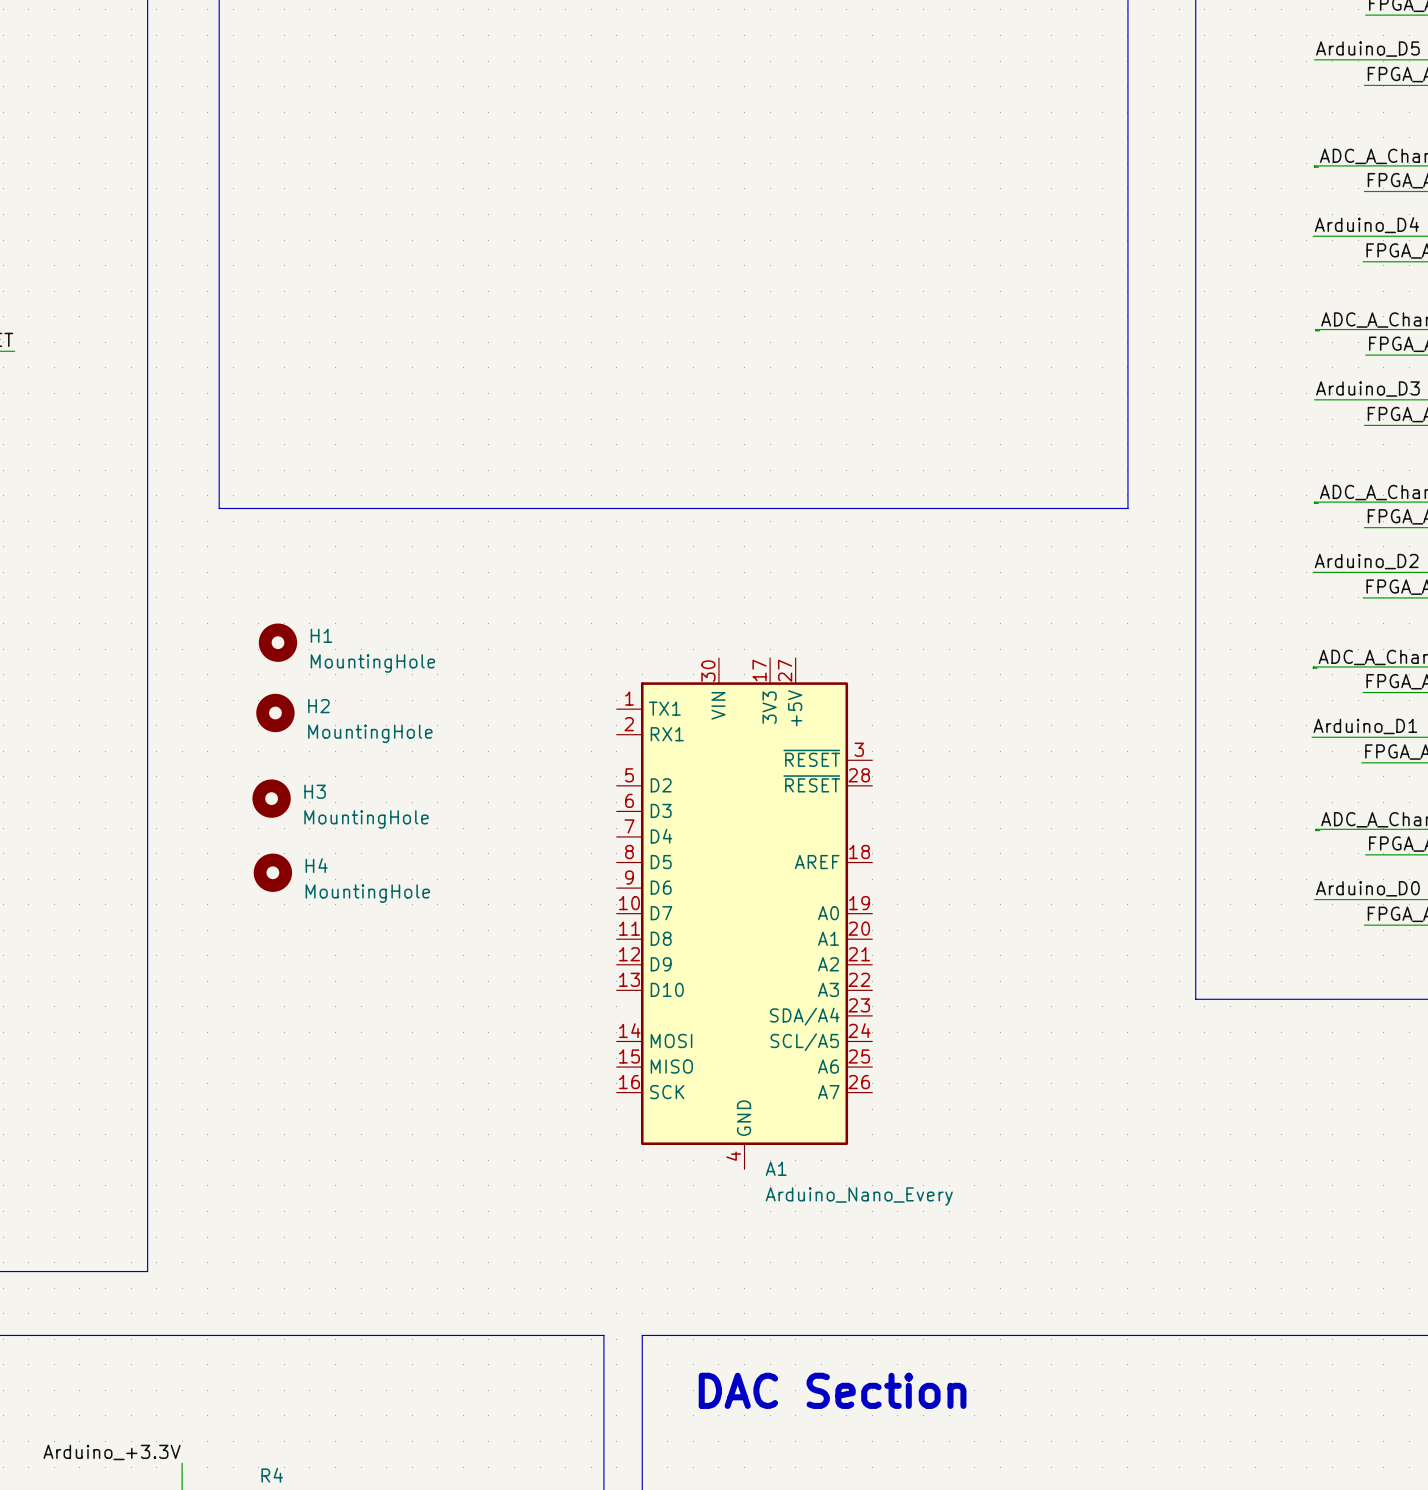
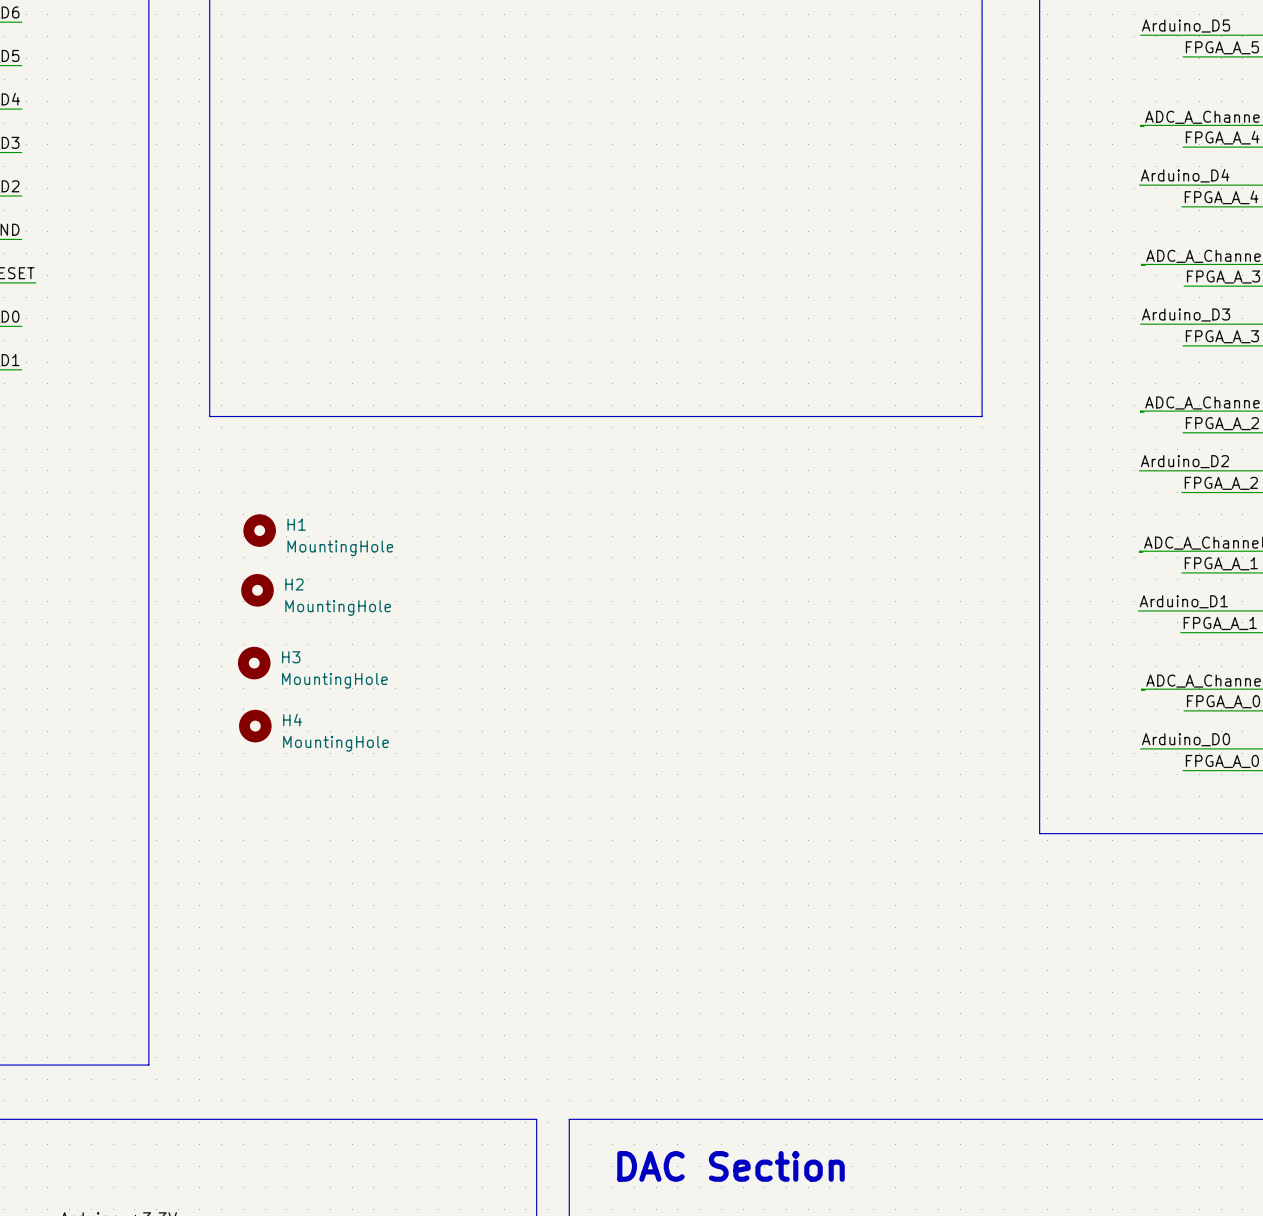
A1: Arduino_Nano_Every (744, 913) -> none

